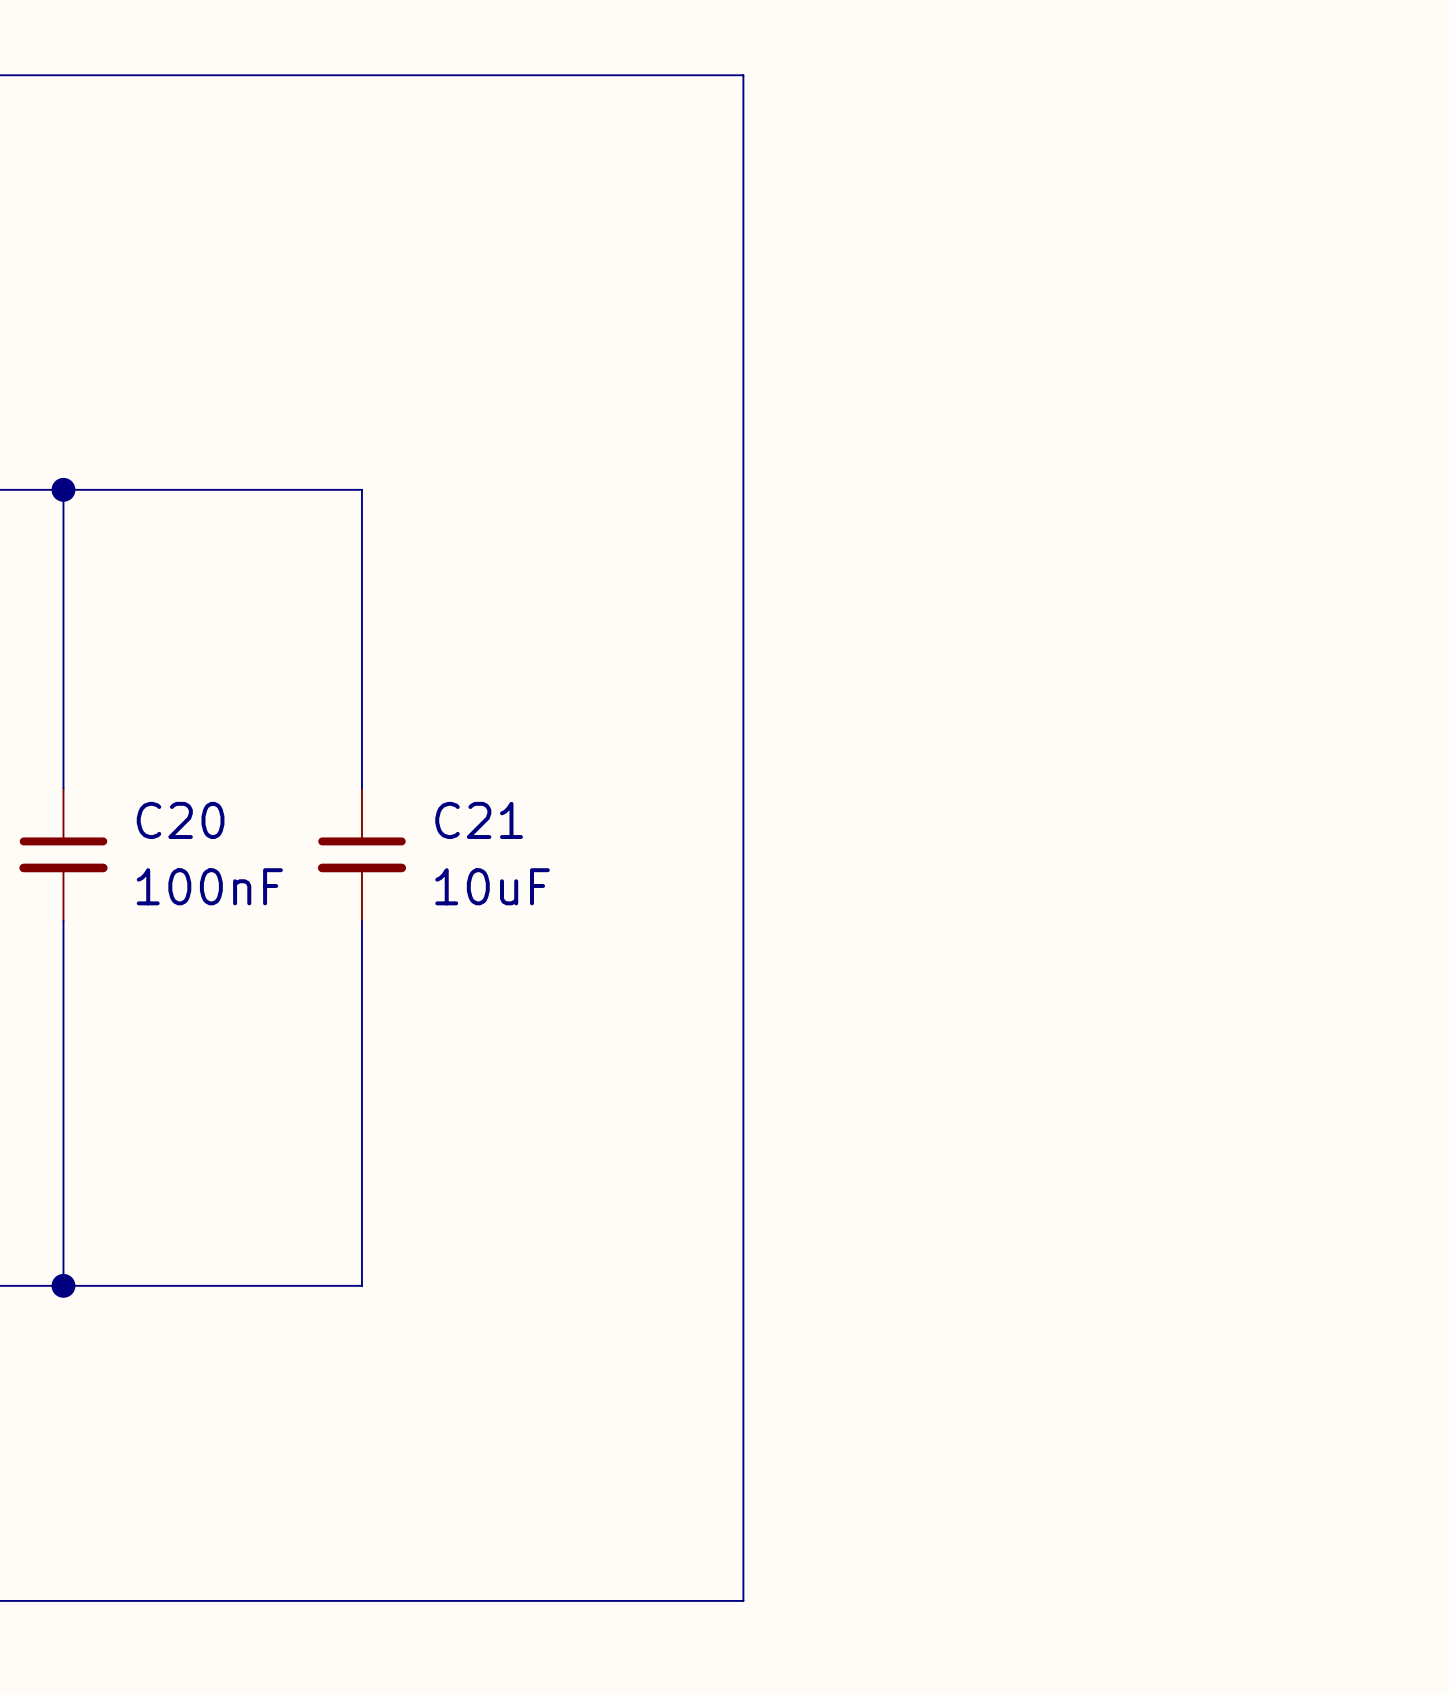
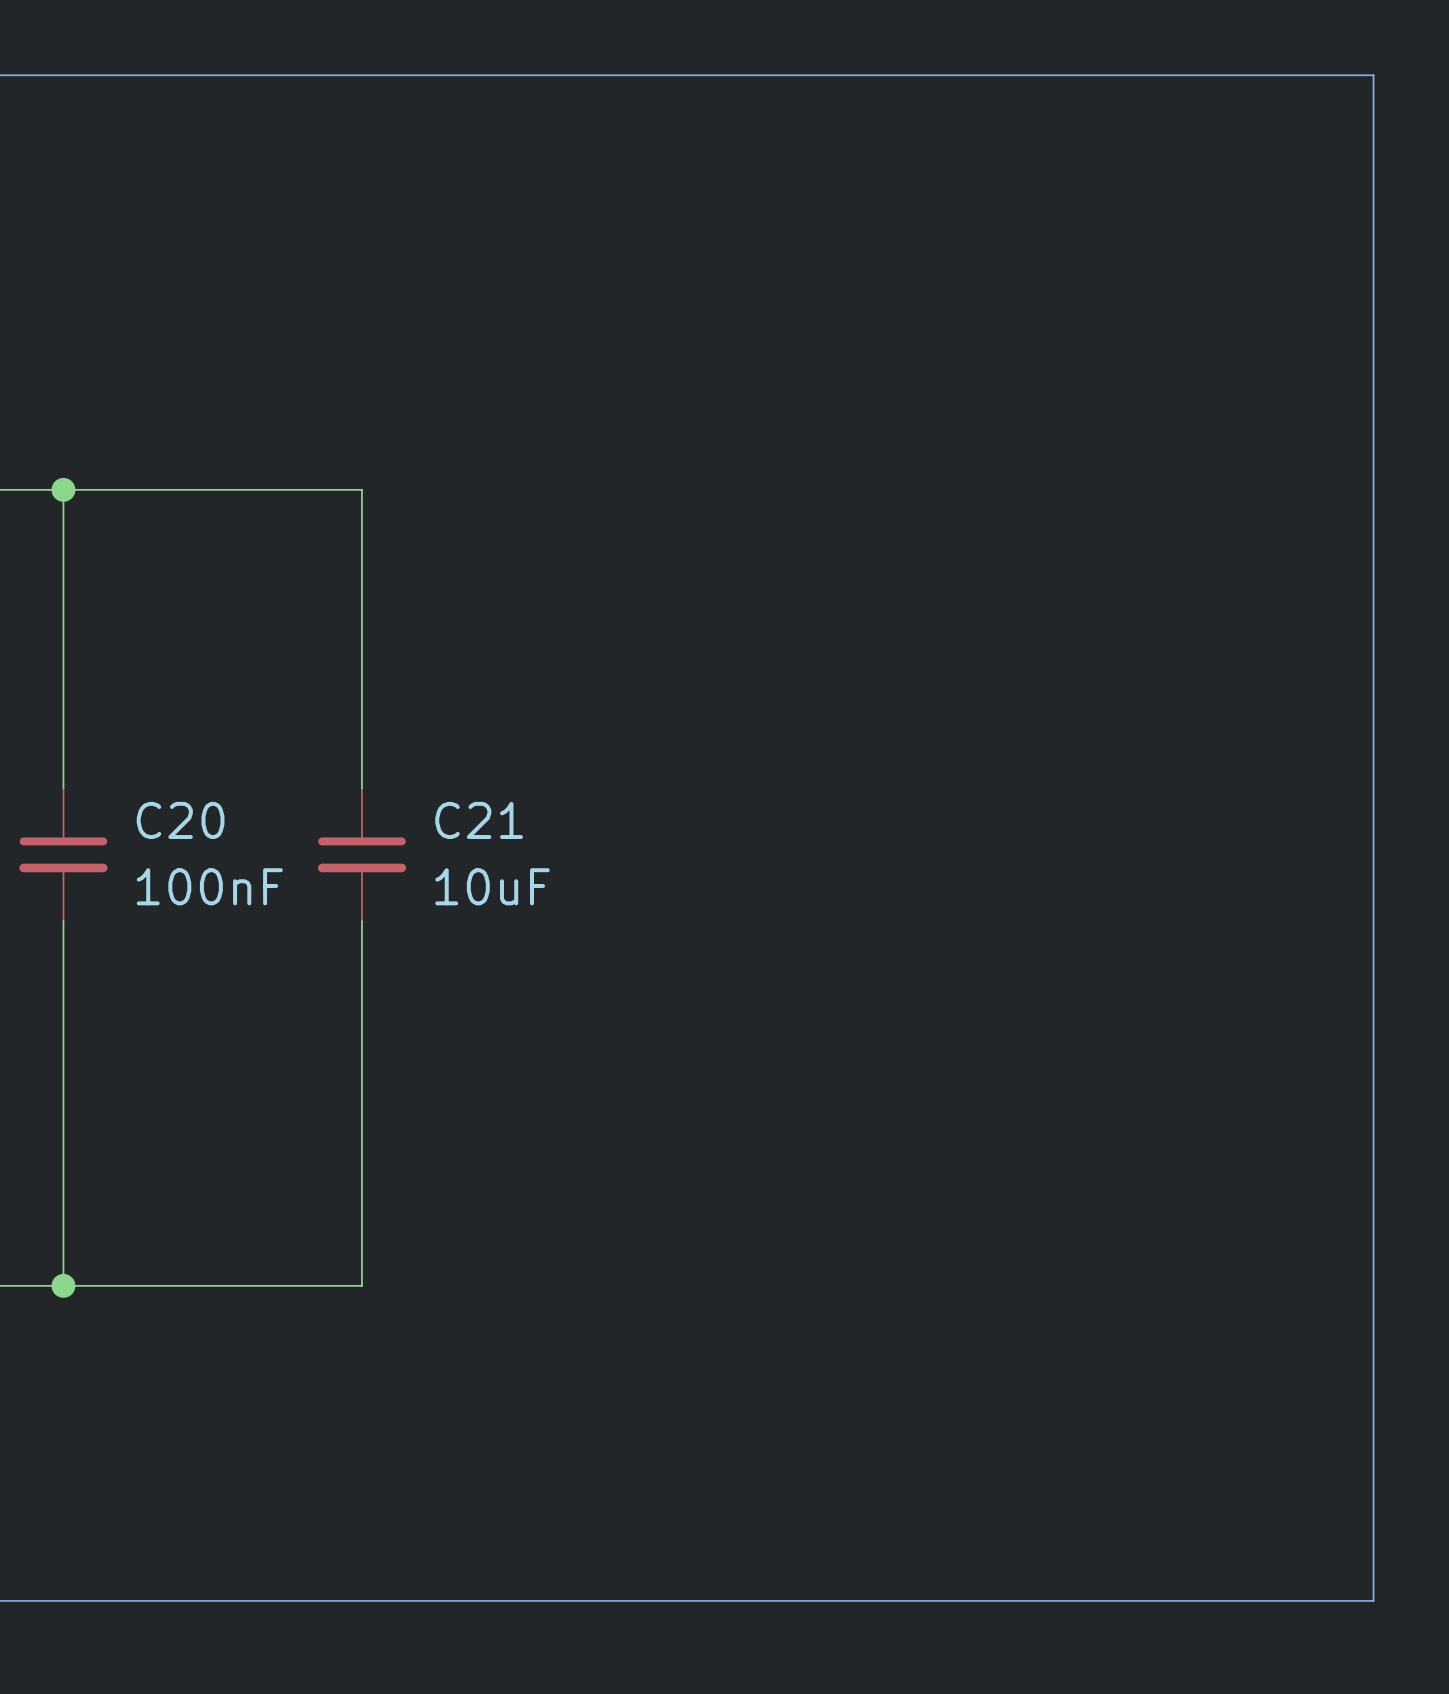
line: (743, 75) (743, 1600) -> (743, 75) (1373, 75) (1373, 1600) (743, 1600)

